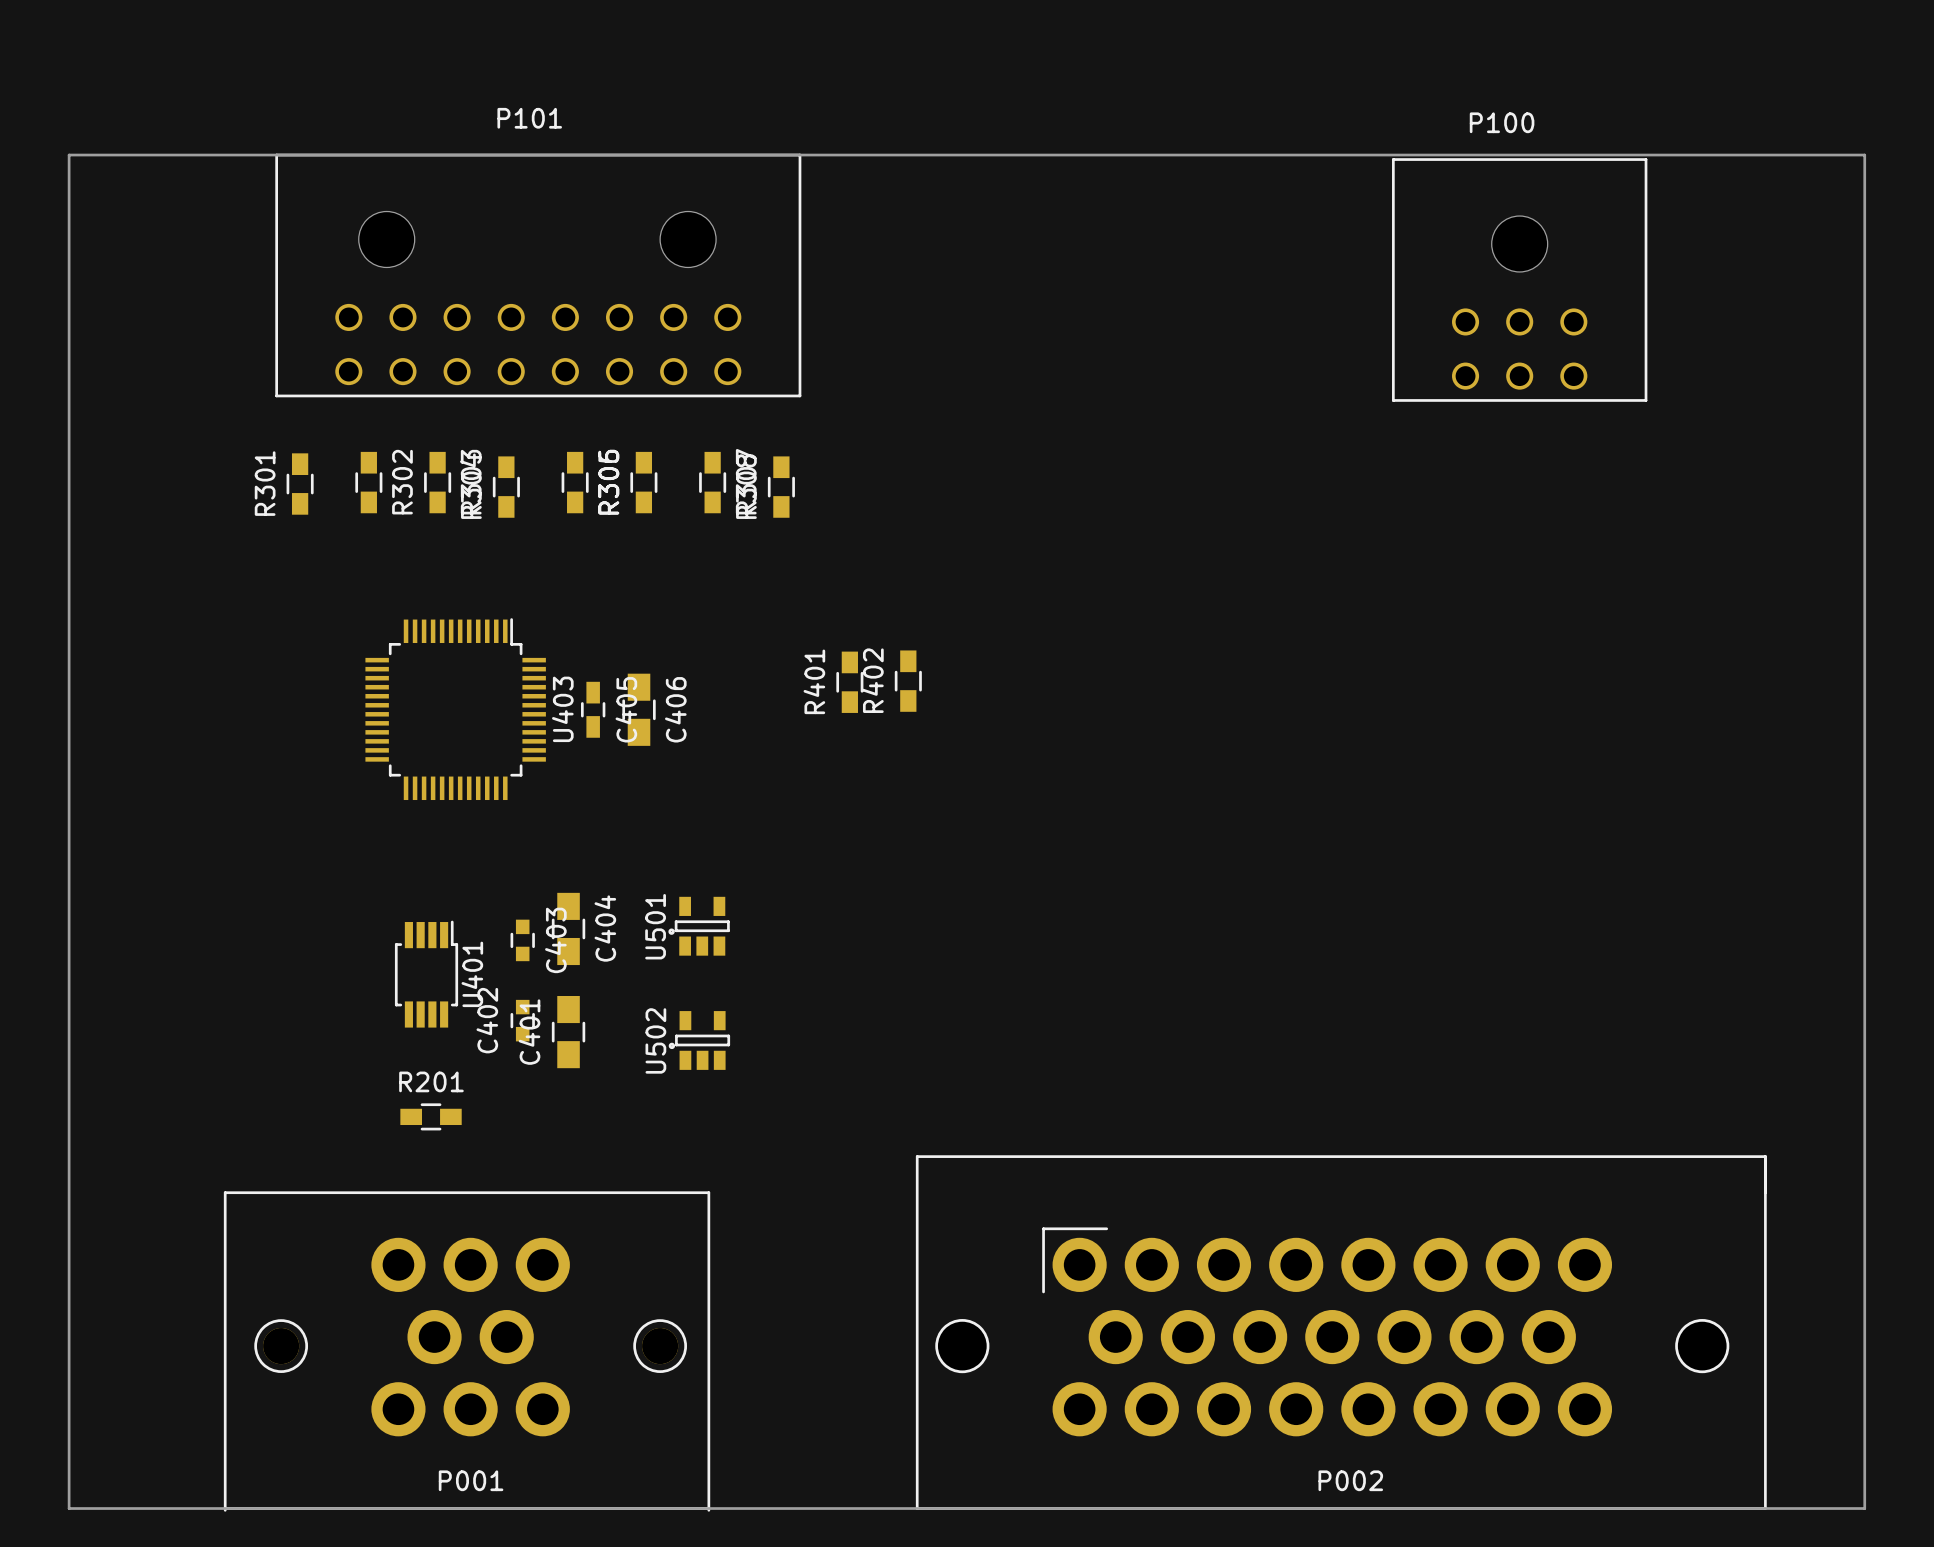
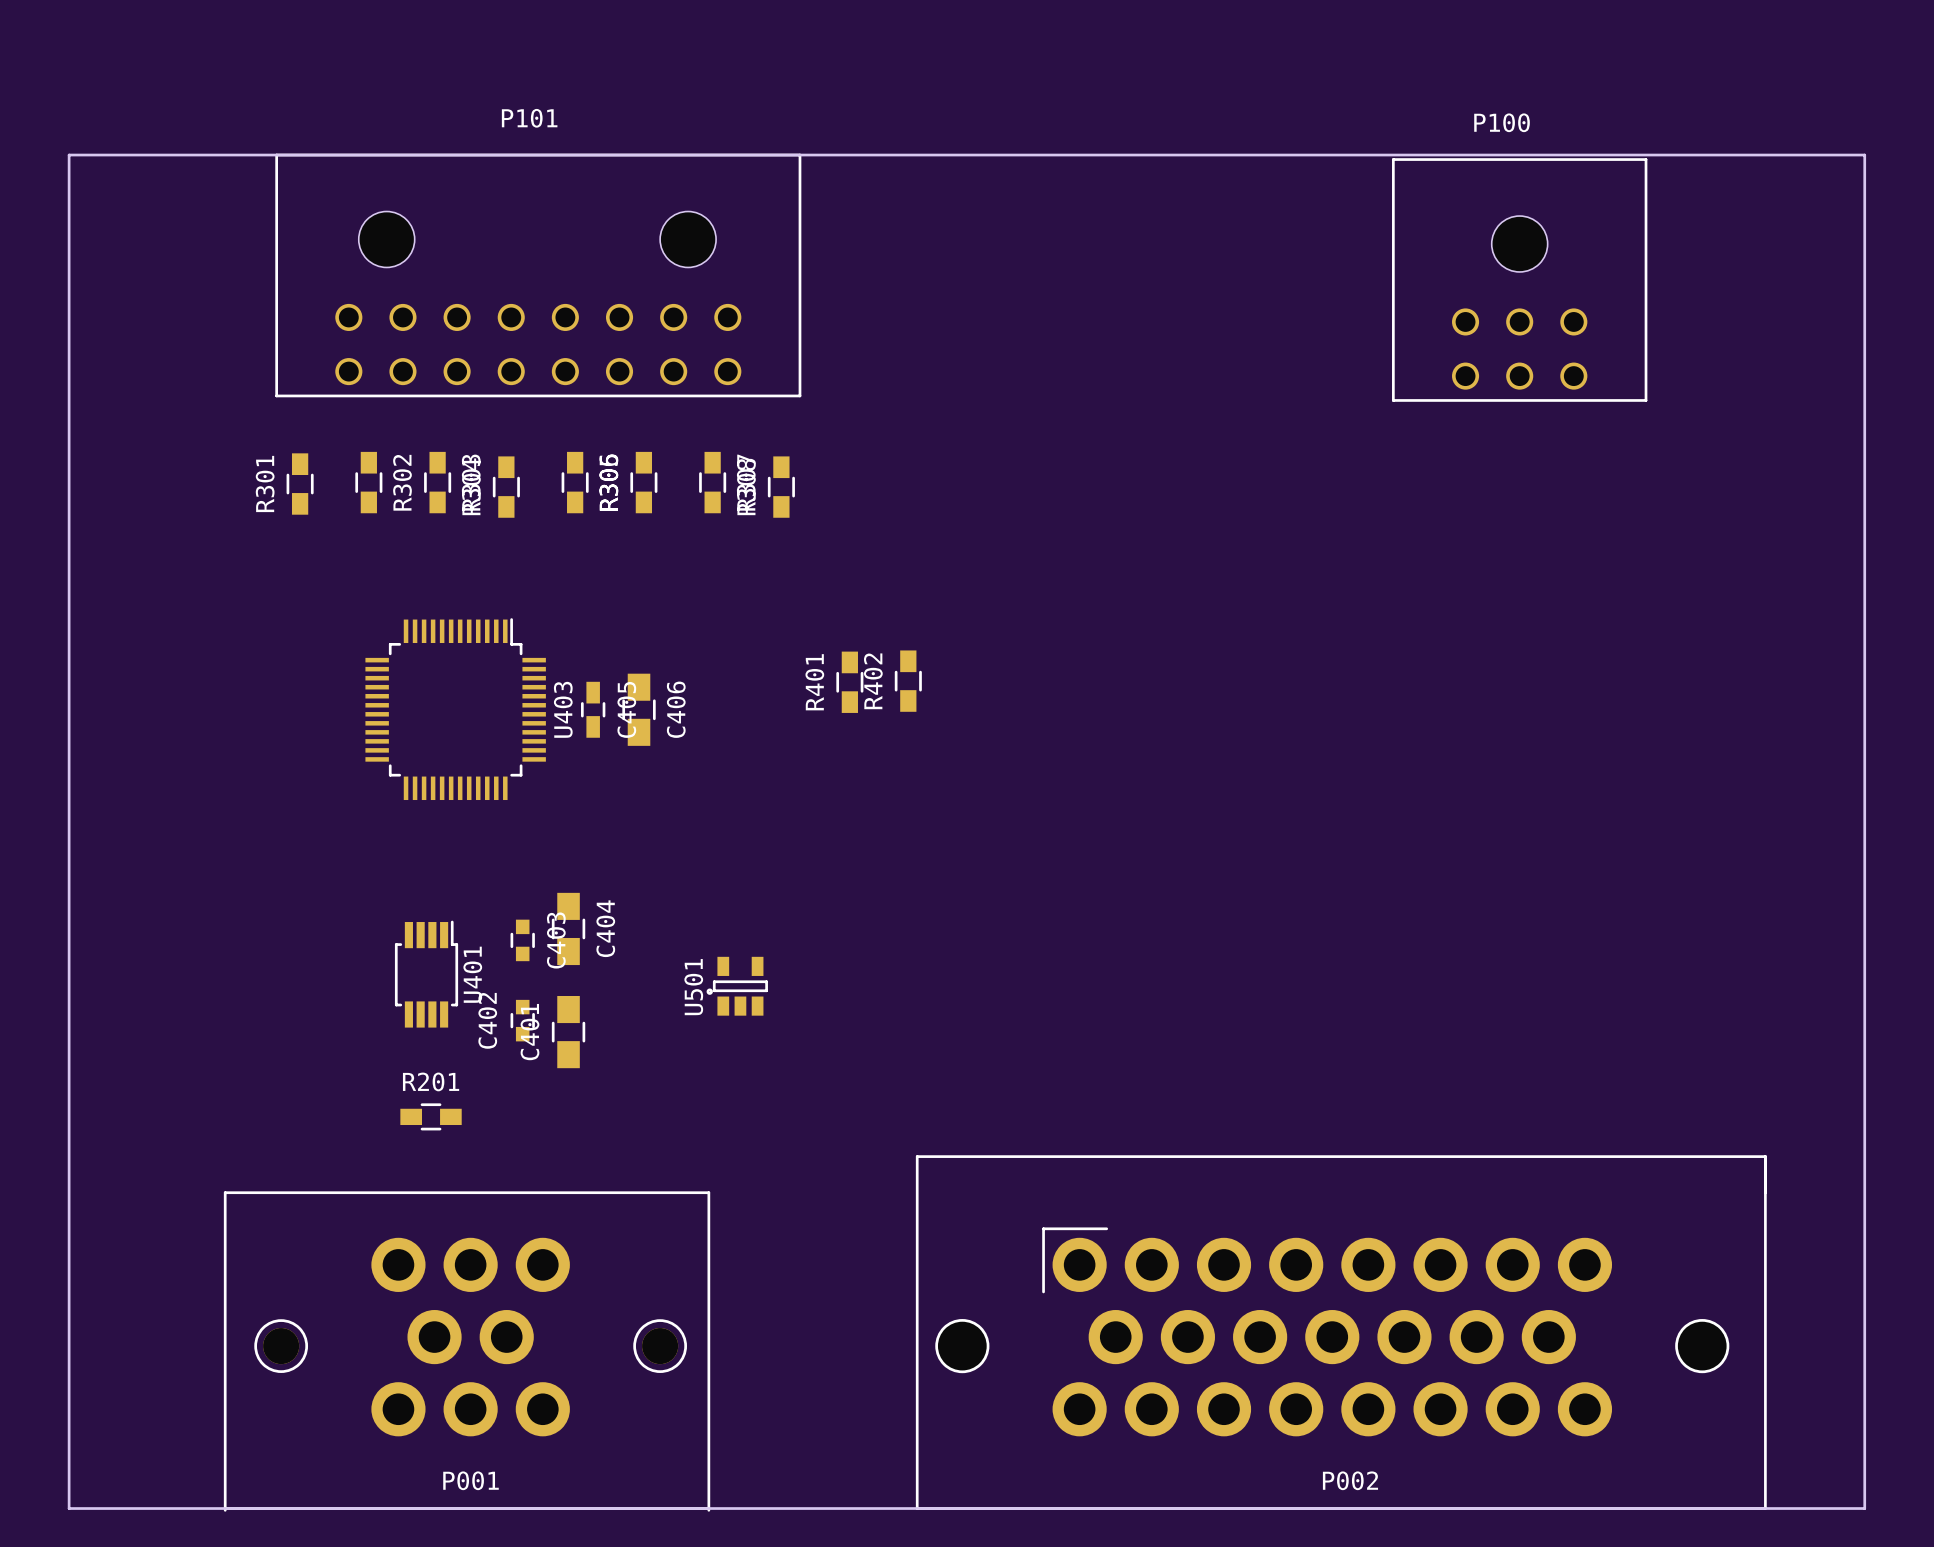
U501 position: (699, 926) -> (737, 986)
U502: (699, 1040) -> none

